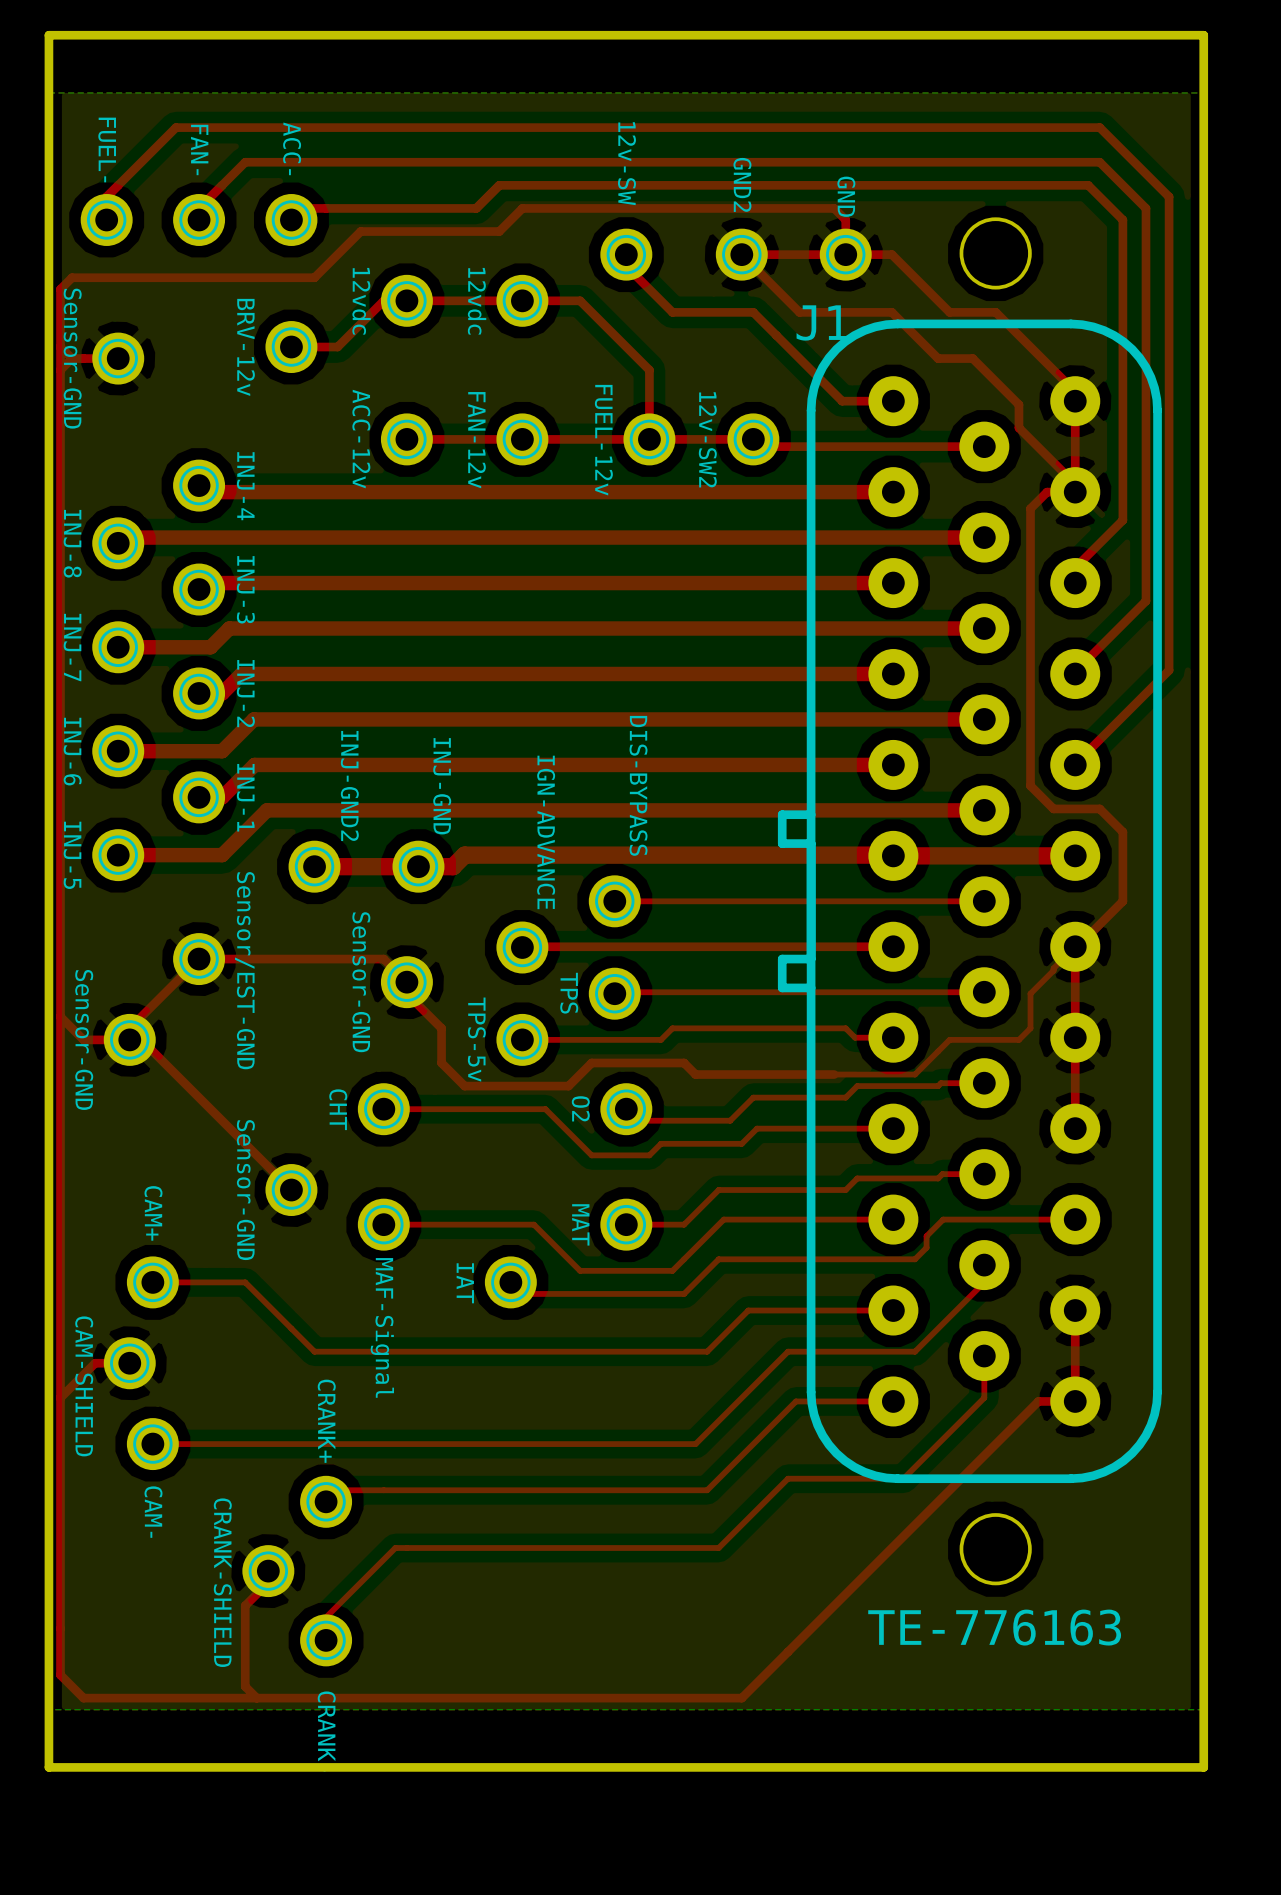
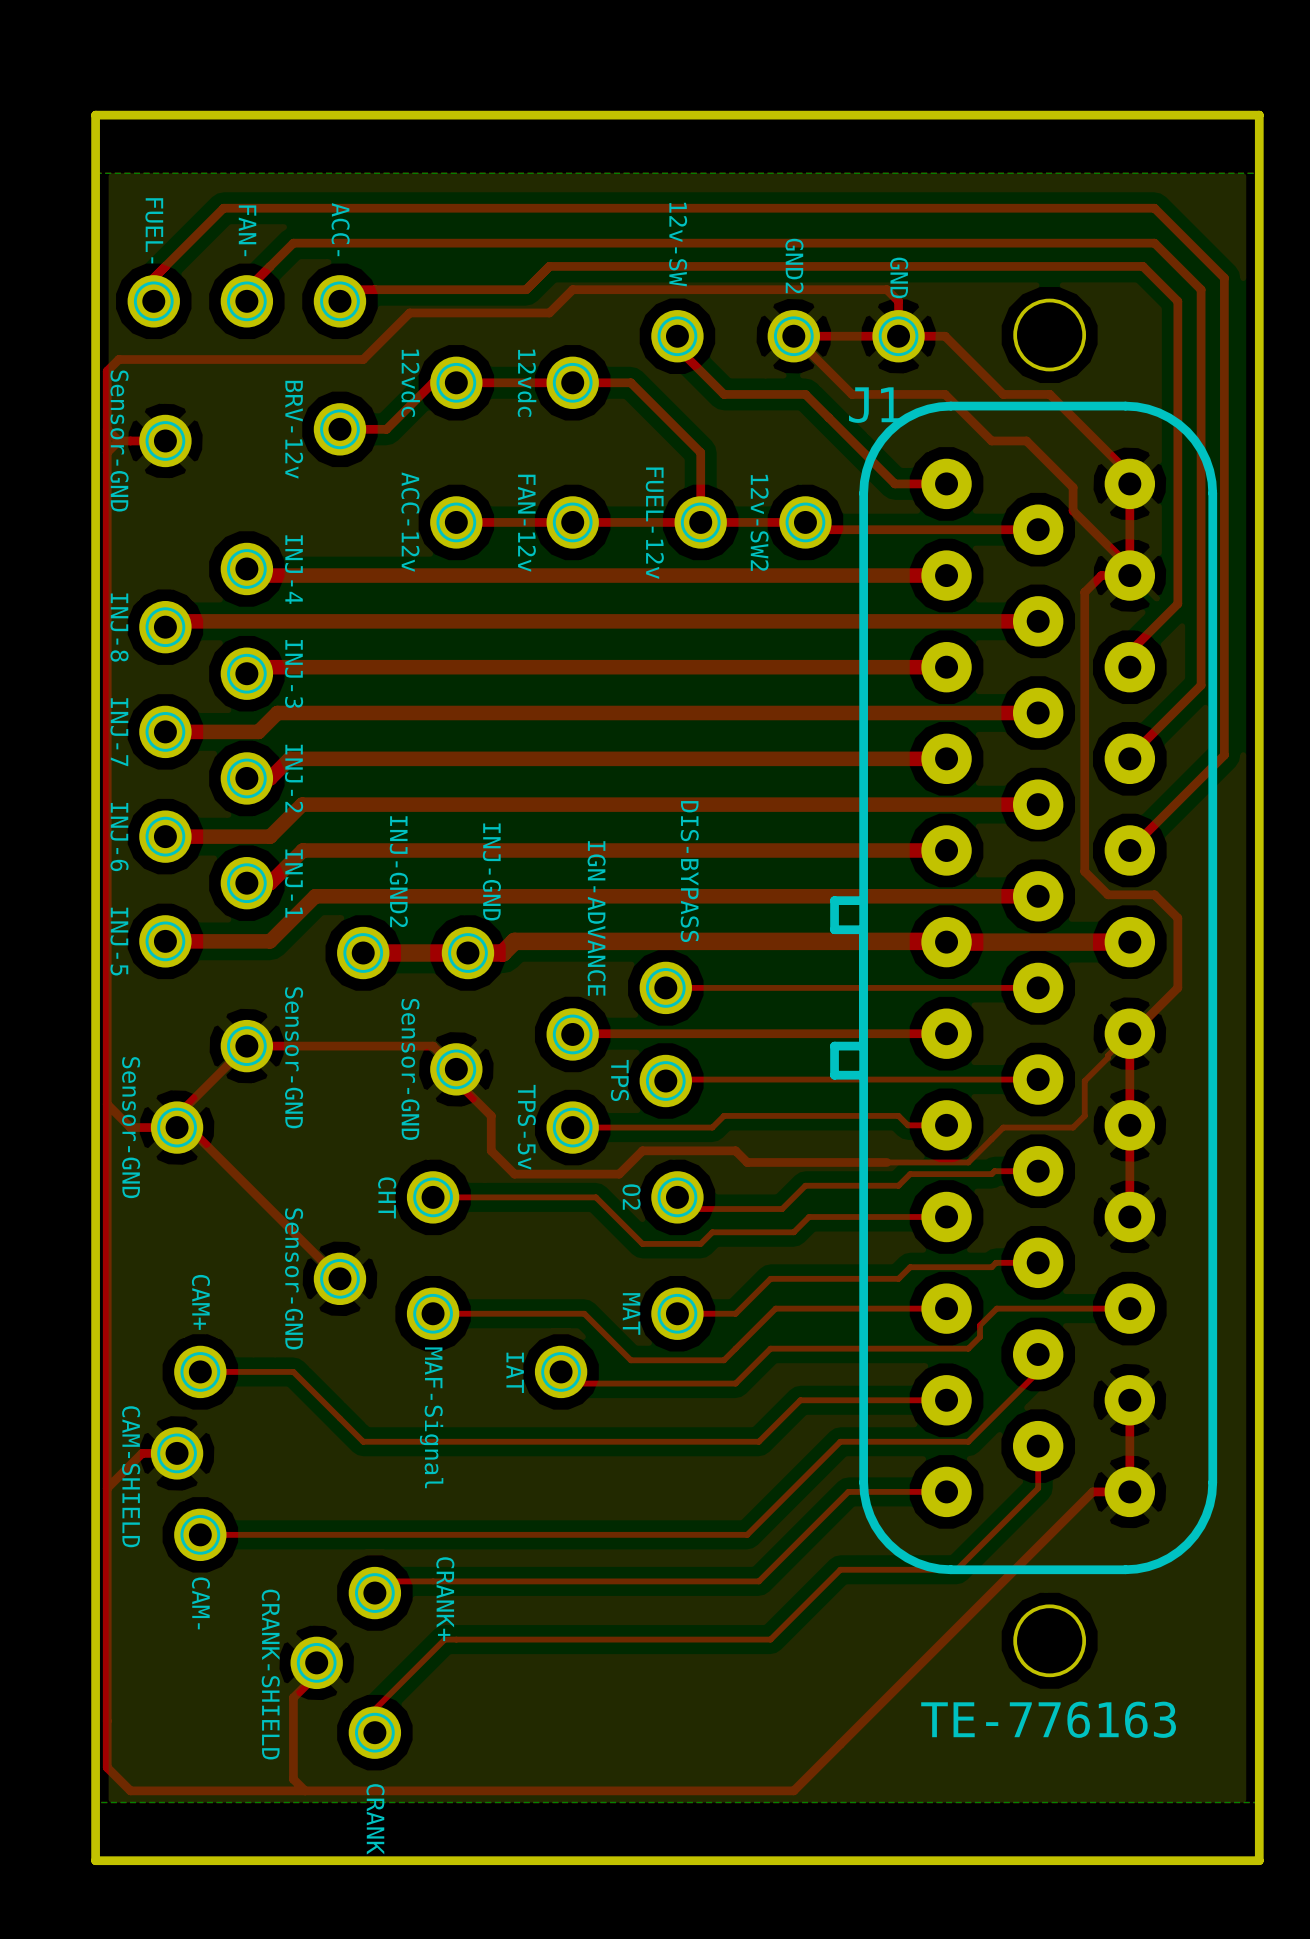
part value: Sensor/EST-GND (244, 970) -> Sensor-GND (294, 1057)
part value position: CRANK+ (326, 1421) -> CRANK+ (445, 1599)

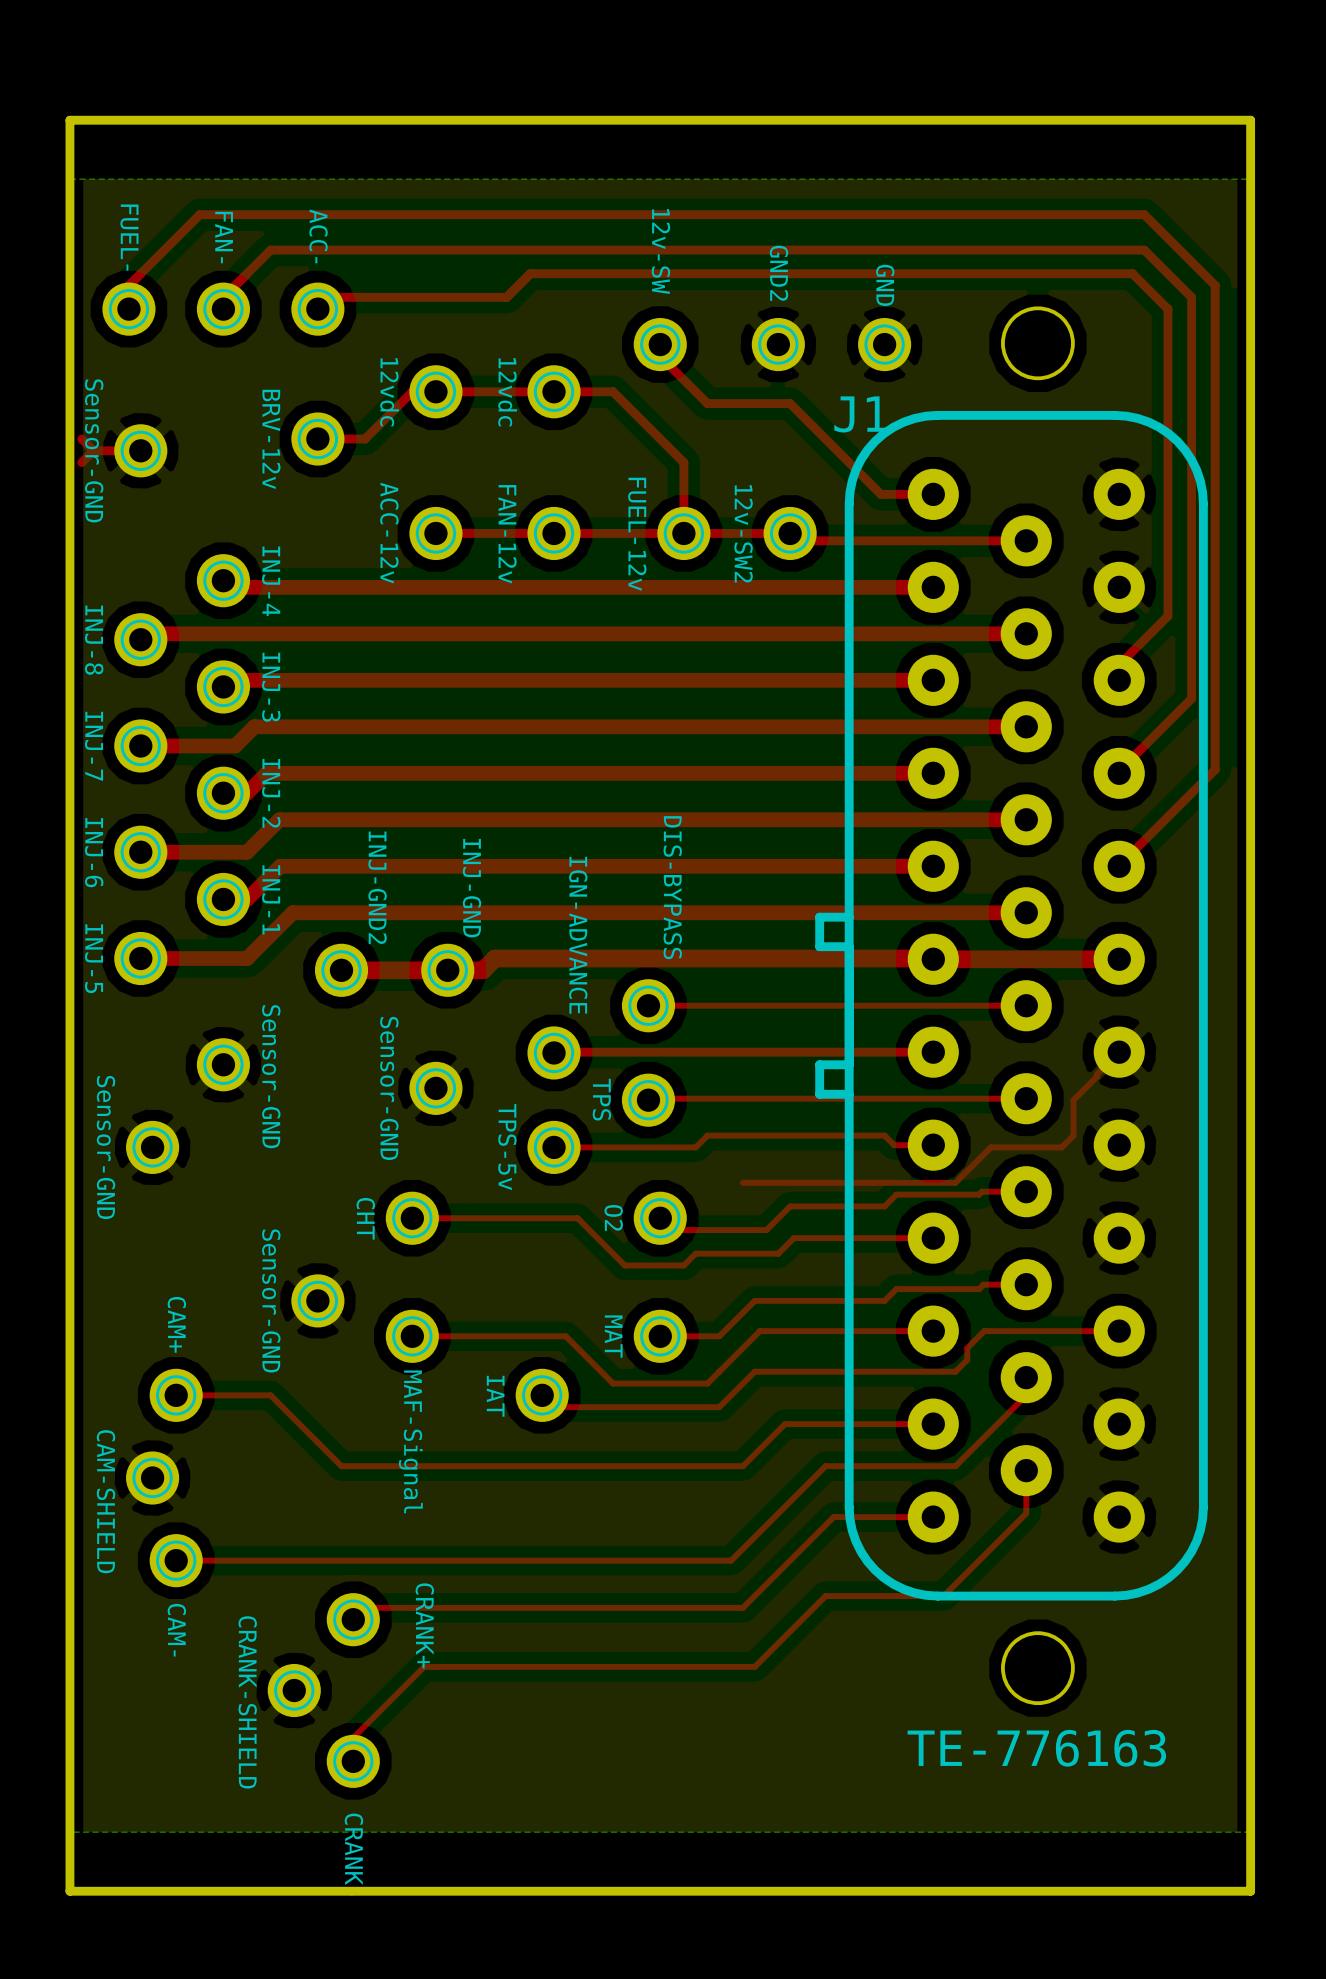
top track: (898, 336) (898, 301) (886, 289) (572, 289) (549, 312) (409, 312) (363, 359) (118, 359) (107, 371) (107, 1767) (130, 1790) (793, 1790) (1092, 1491) (1129, 1491) (1129, 1400) -> none
top track: (1129, 567) (1073, 510) (1073, 487) (1026, 440) (991, 440) (945, 394) (852, 394) (793, 336) (945, 336) (1003, 394) (1049, 394) (1129, 474) (1129, 575) (1101, 575) (1084, 592) (1084, 871) (1108, 894) (1154, 894) (1177, 918) (1177, 987) (1132, 1033) (1129, 1033) (1129, 1216) -> none
top track: (107, 1104) (130, 1127) (188, 1127) (339, 1278) -> none
top track: (177, 1127) (177, 1115) (246, 1046) (433, 1046) (456, 1069) (456, 1081) (491, 1115) (491, 1150) (514, 1174) (619, 1174) (642, 1150) (735, 1150) (747, 1162) (886, 1162) -> none
top track: (177, 1453) (142, 1453) (107, 1488) -> none
top track: (316, 1662) (316, 1674) (293, 1697) (293, 1779) (305, 1790) -> none

